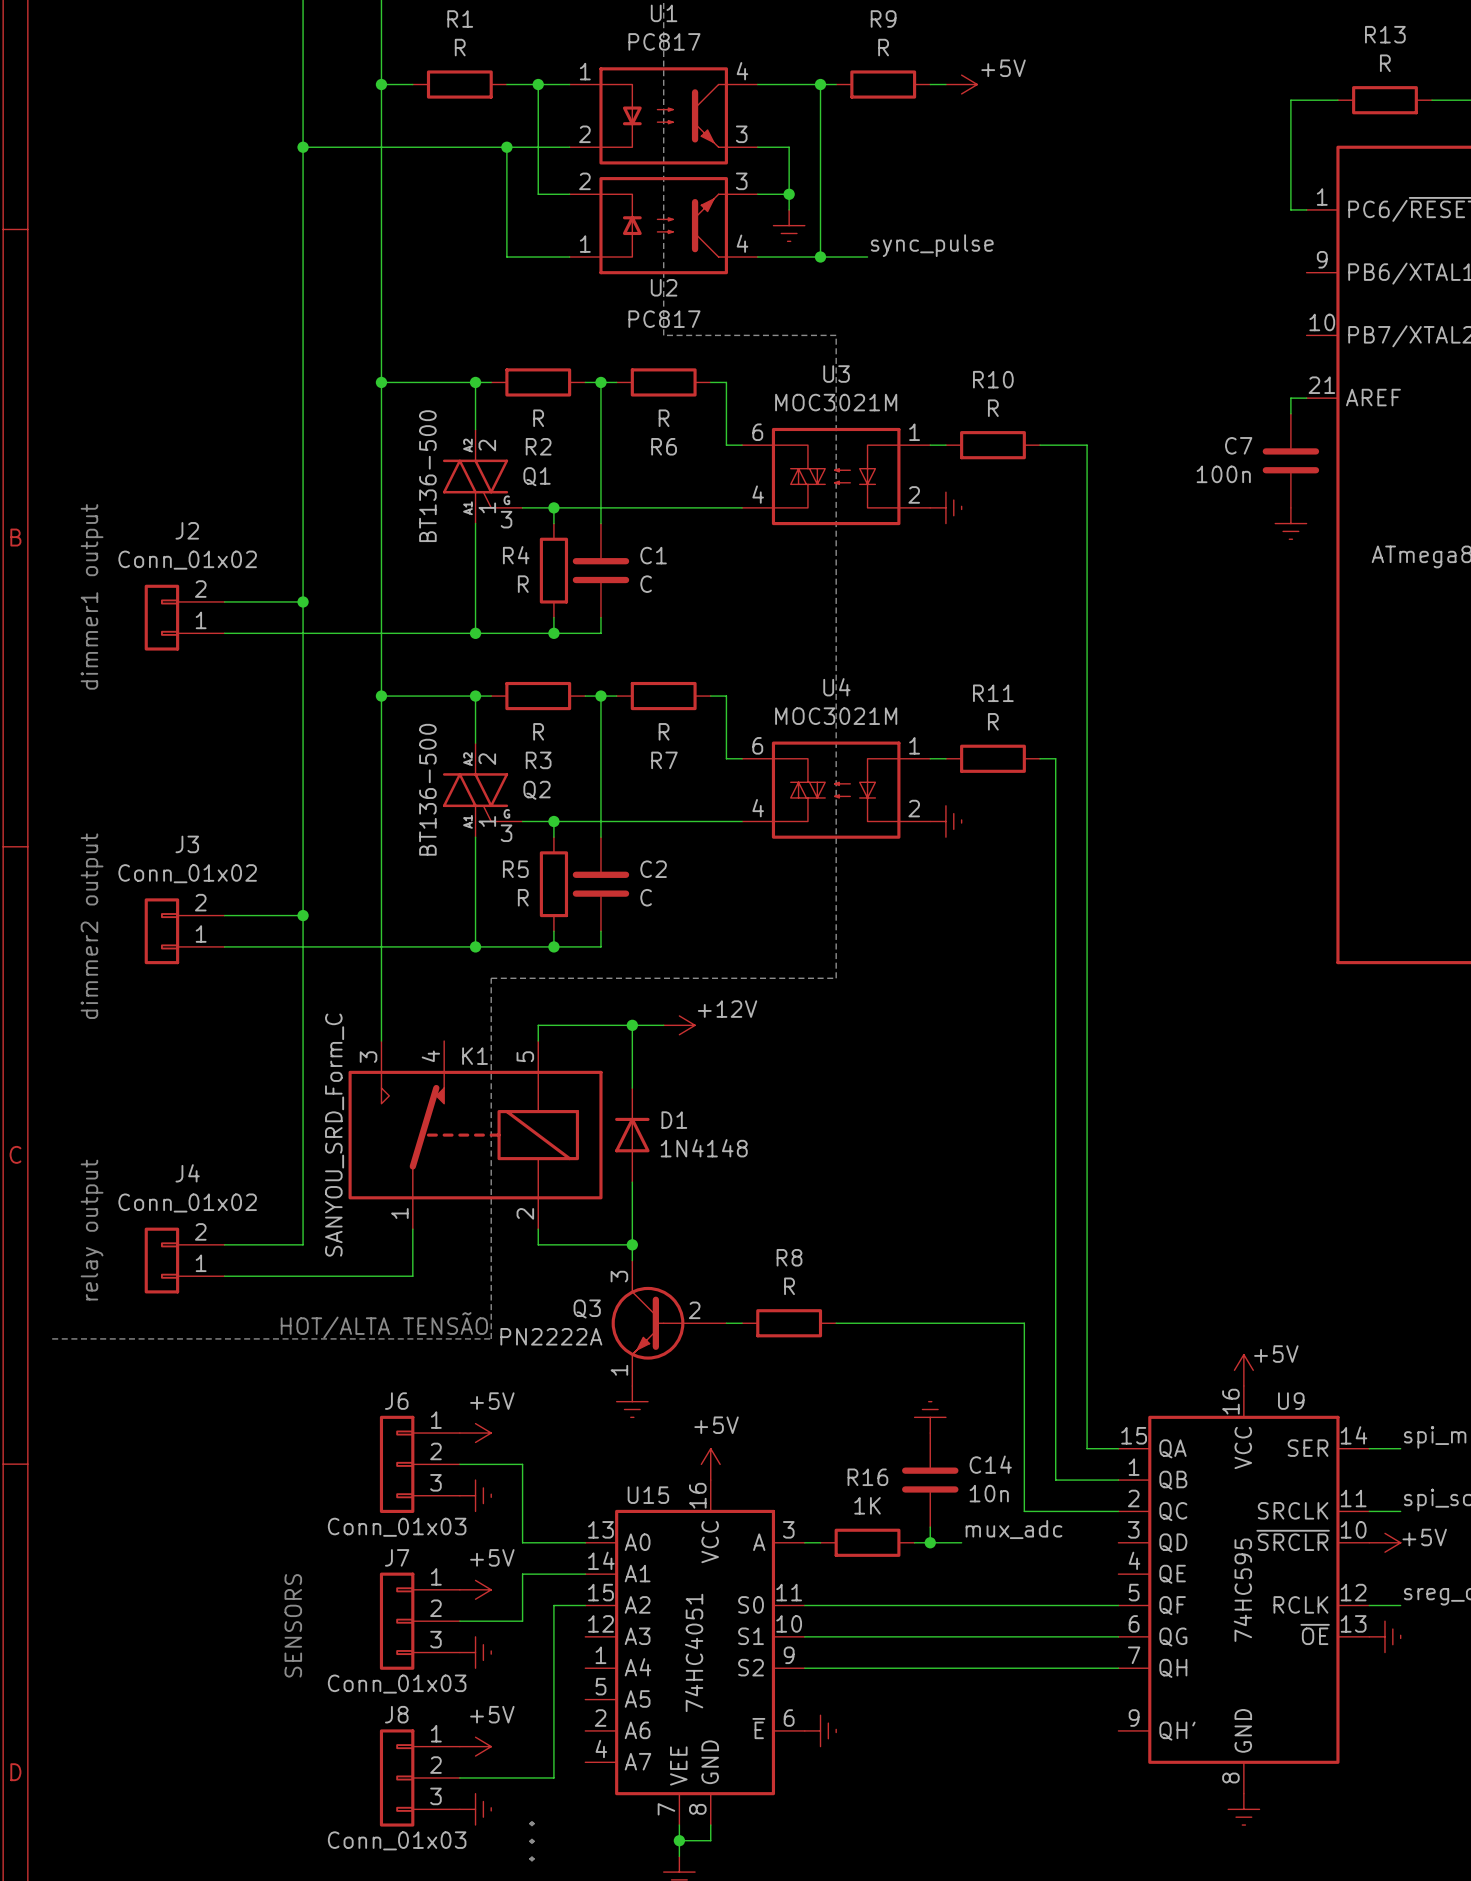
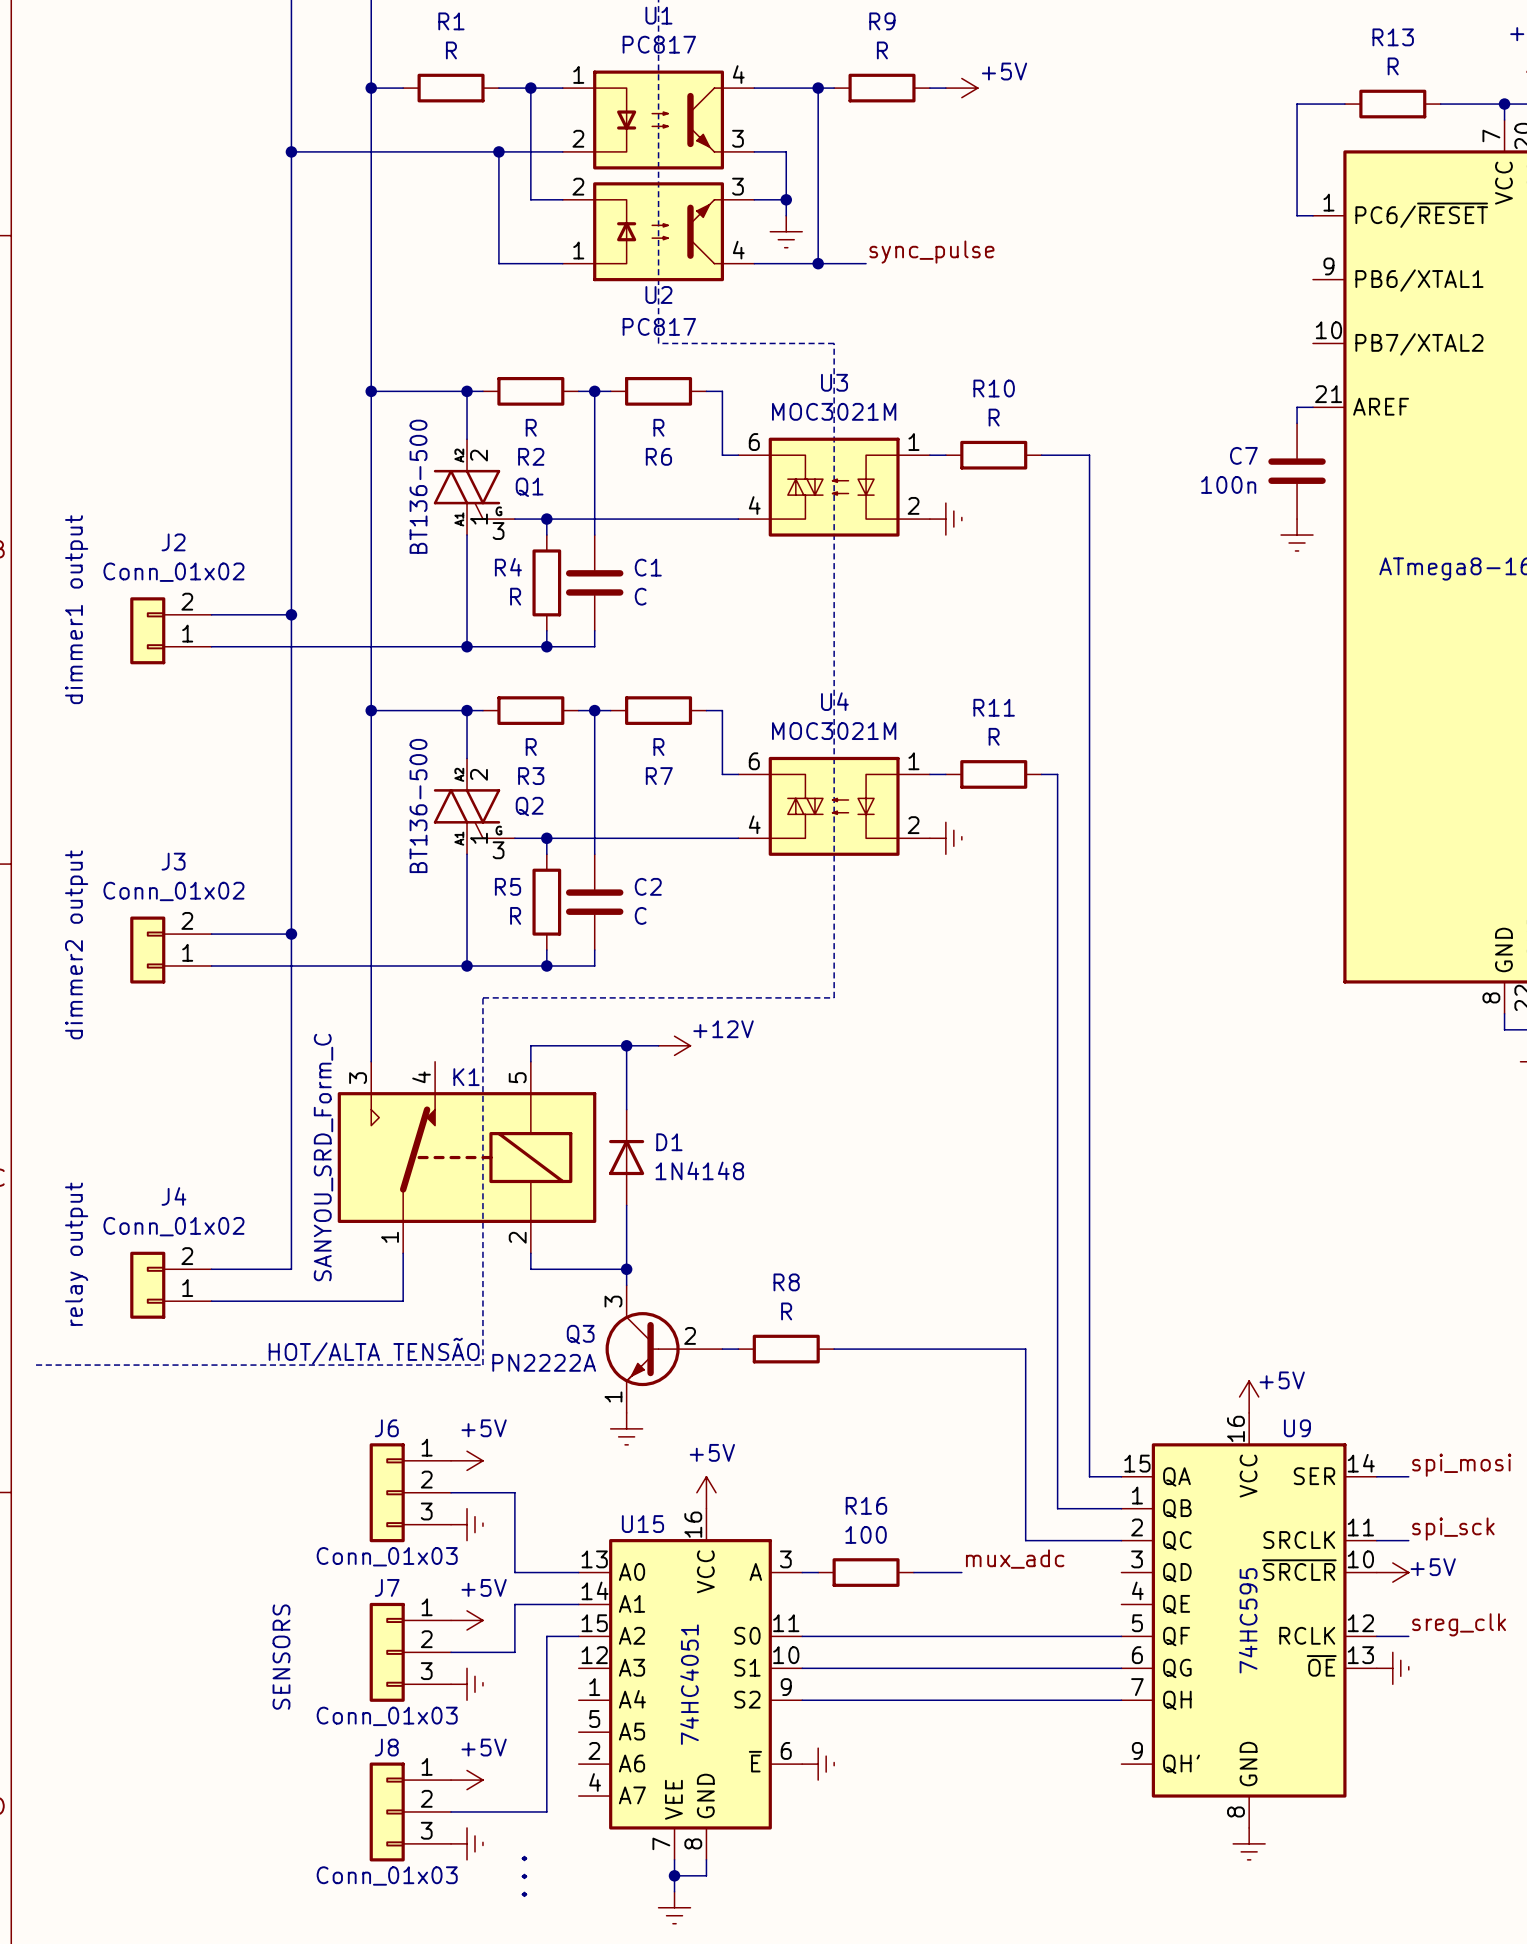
power symbol: (930, 1417) -> none
C14: 10n (930, 1480) -> none
R16 value: 1K (867, 1505) -> 100 (866, 1534)
wire: (930, 1527) (930, 1542) -> none
junction: (930, 1542) -> none

